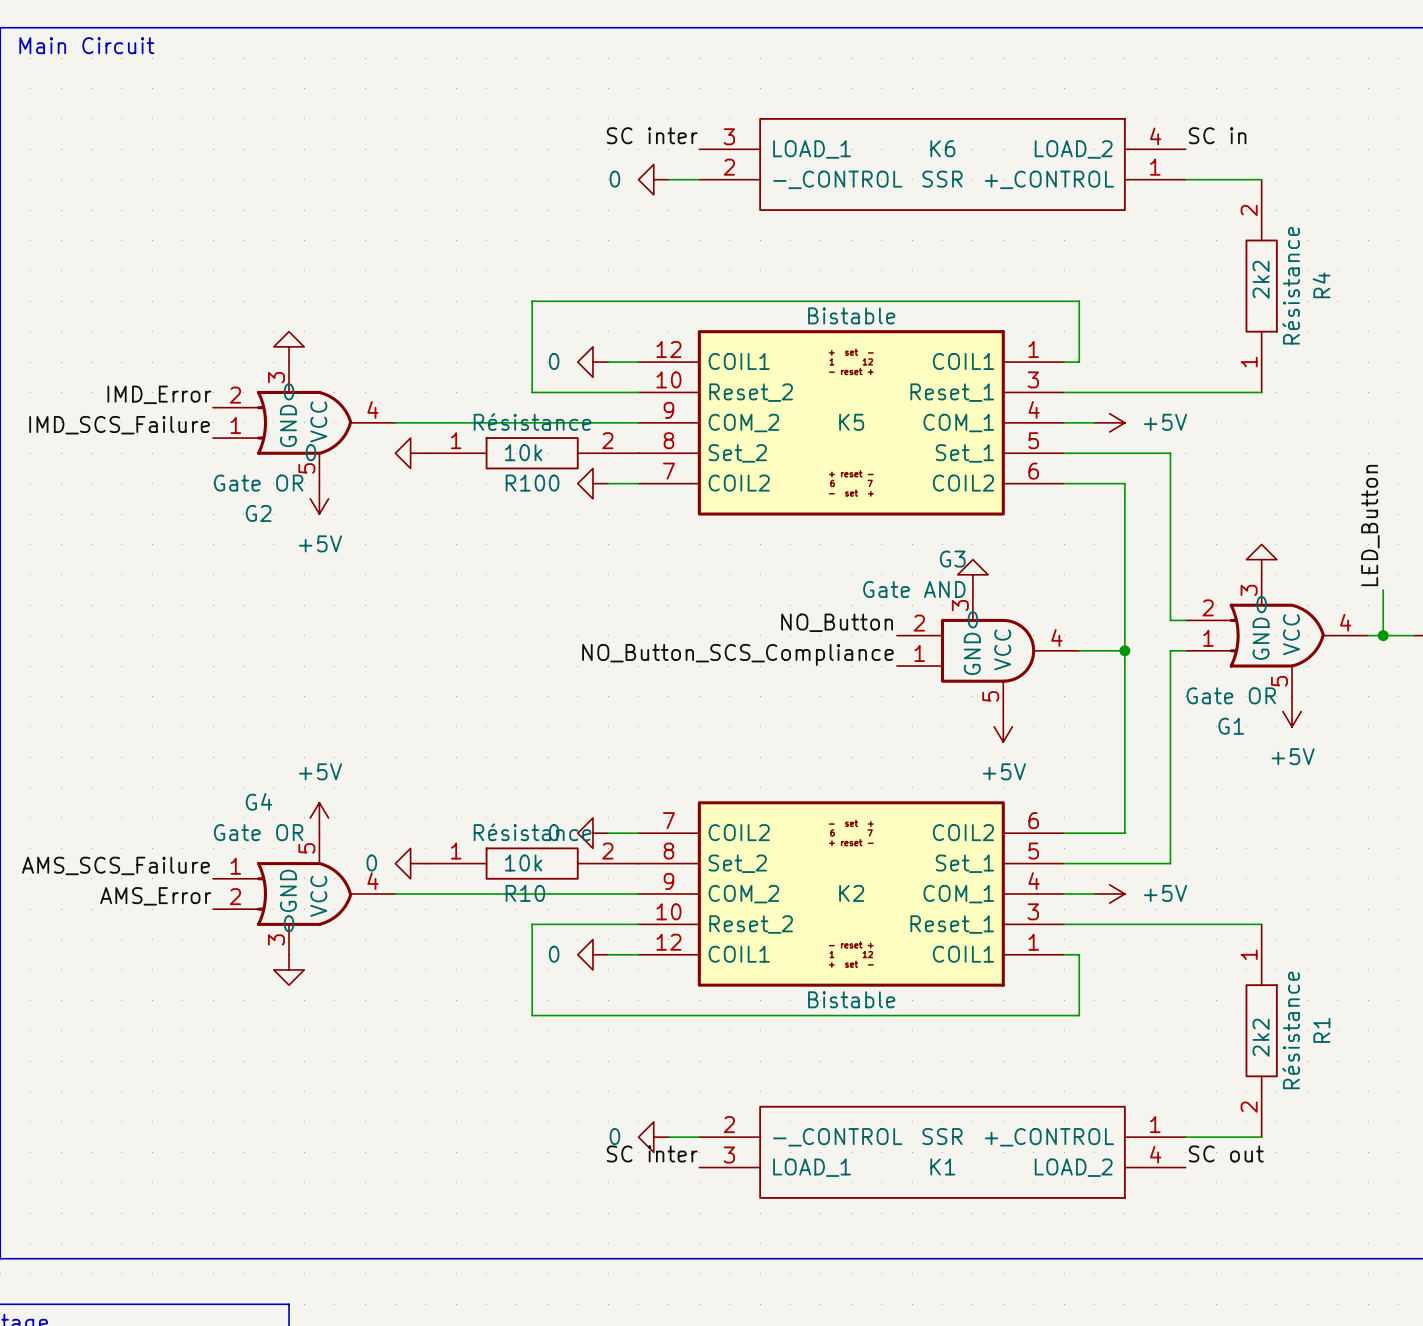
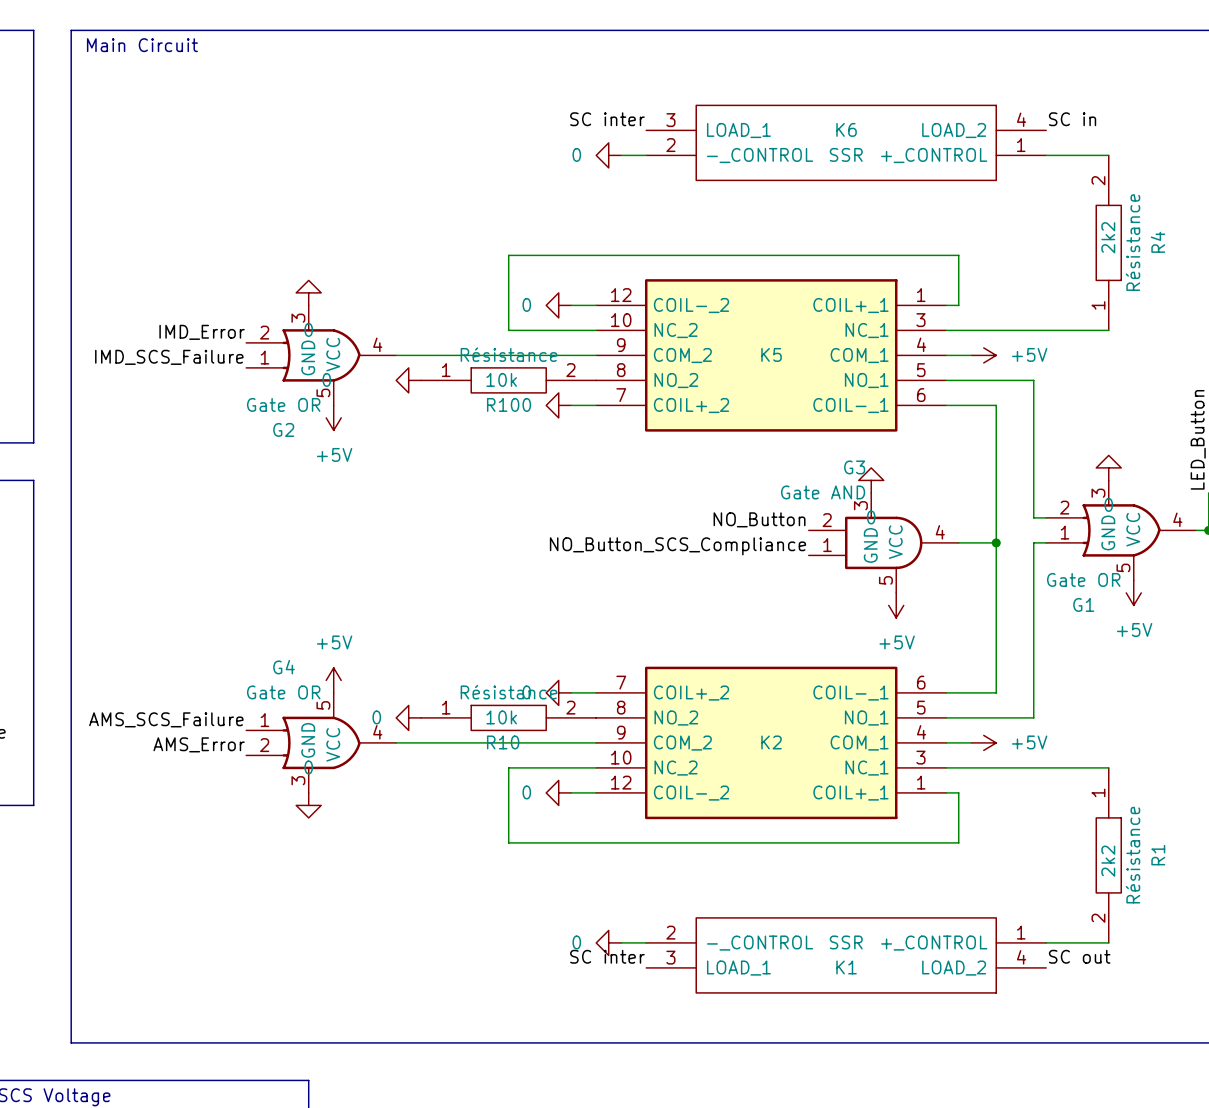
K5 text: Bistable (851, 315) -> none
K5 symbol: [638, 330, 1065, 516] -> [596, 279, 947, 432]
K2 symbol: [638, 801, 1065, 987] -> [596, 666, 947, 820]
K2 text: Bistable (851, 999) -> none

